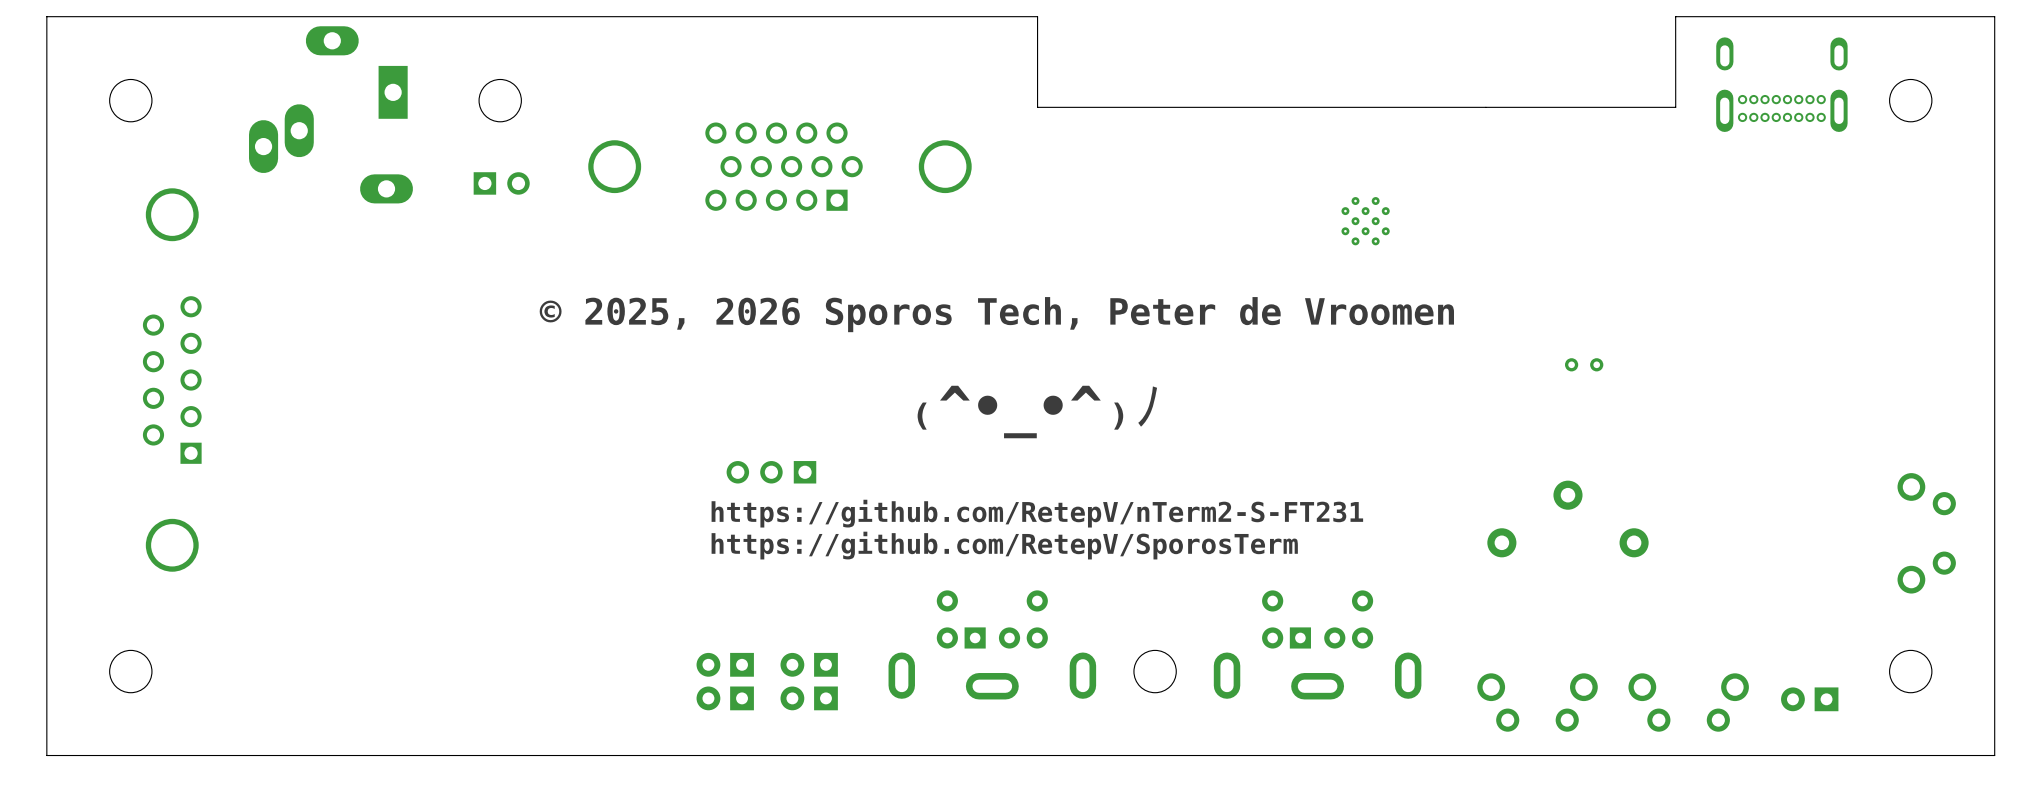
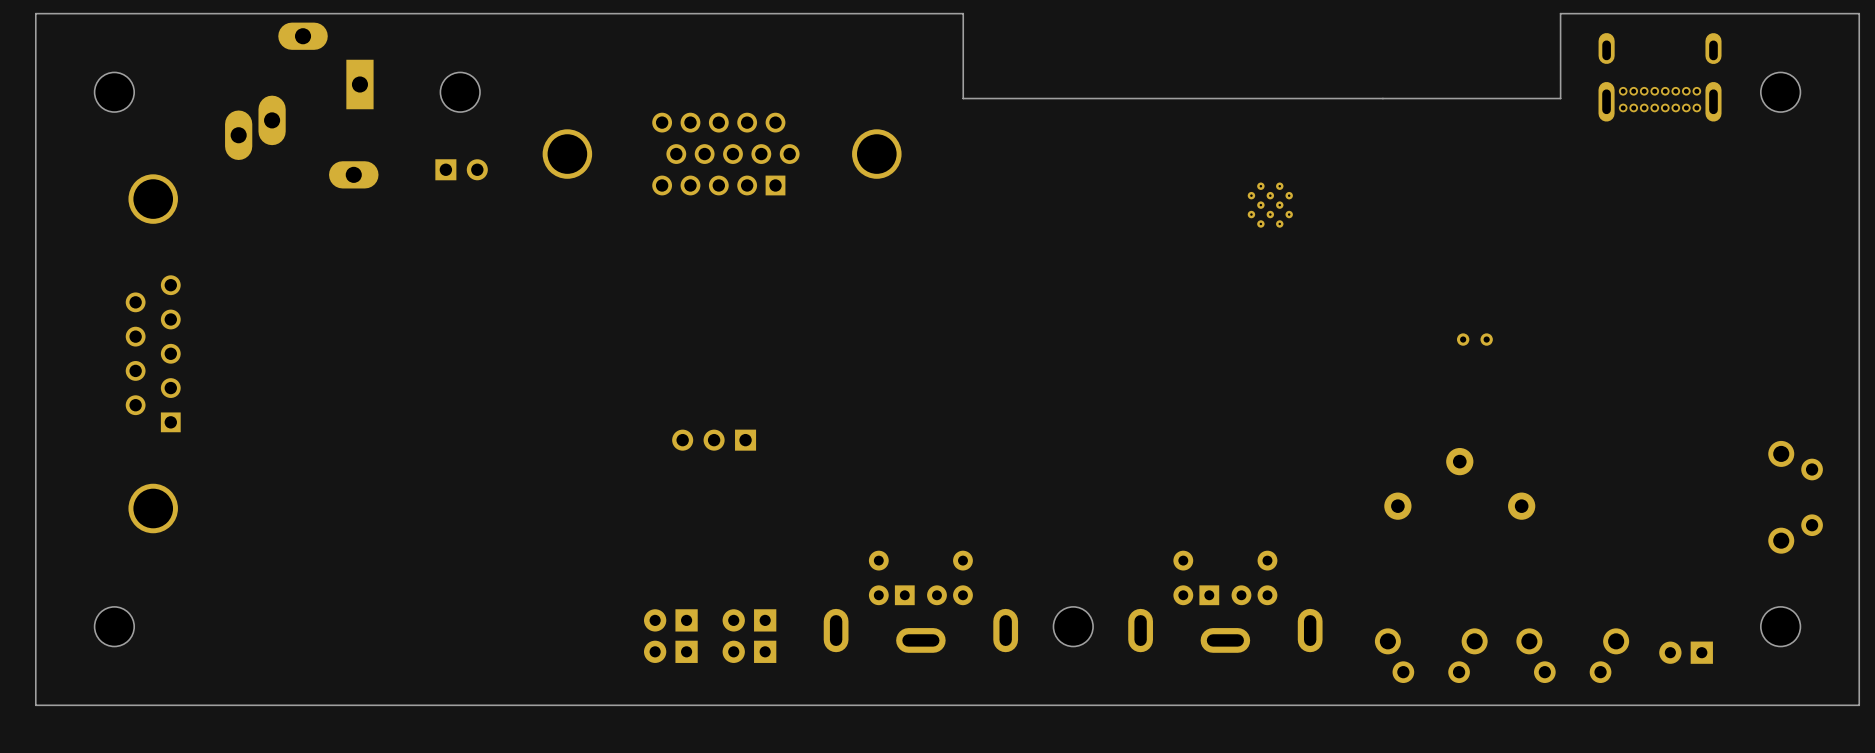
text: © 2025, 2026 Sporos Tech, Peter de Vroomen (996, 314) -> none
text: ₍^•_•^₎ﾉ (1037, 412) -> none
text: https://github.com/RetepV/nTerm2-S-FT231 (1037, 513) -> none
text: https://github.com/RetepV/SporosTerm (1004, 545) -> none

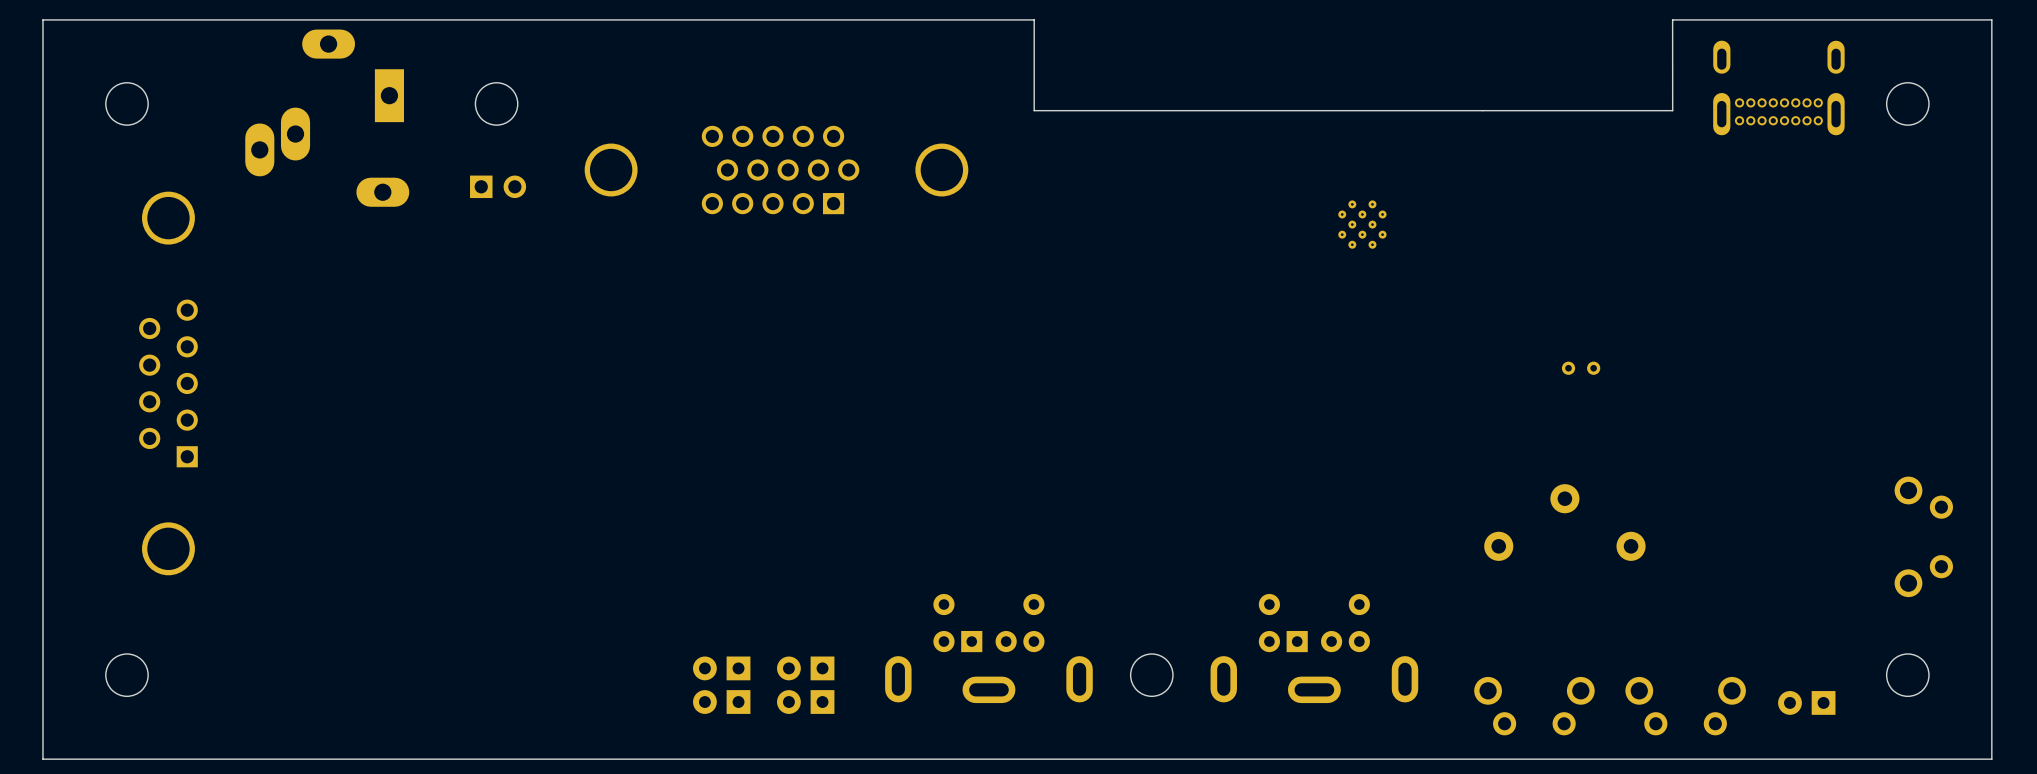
part: (714, 440) -> none

